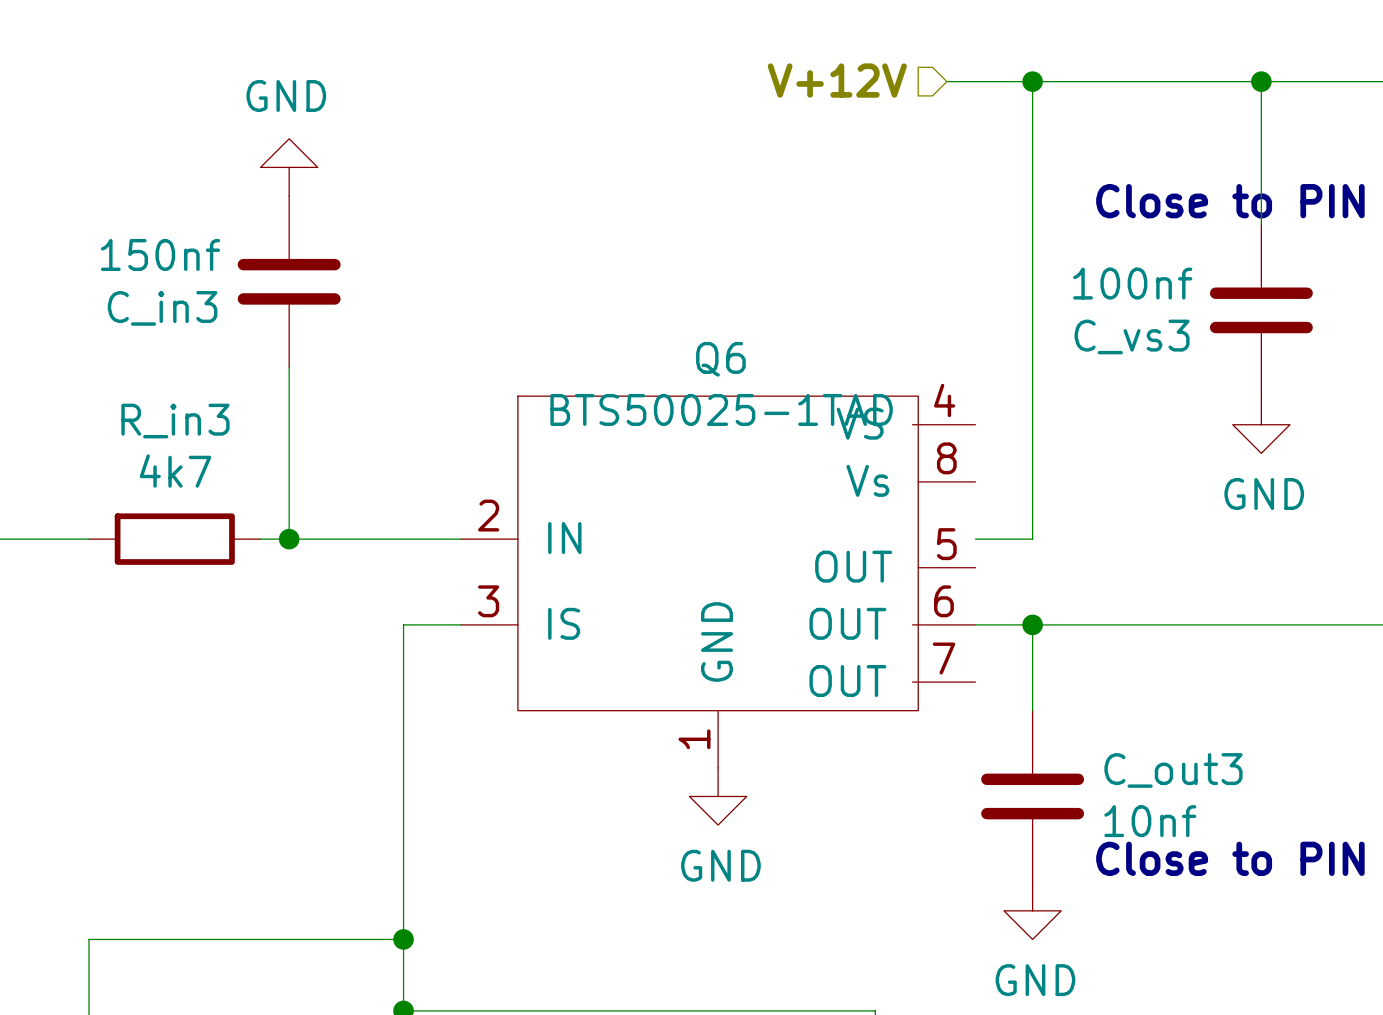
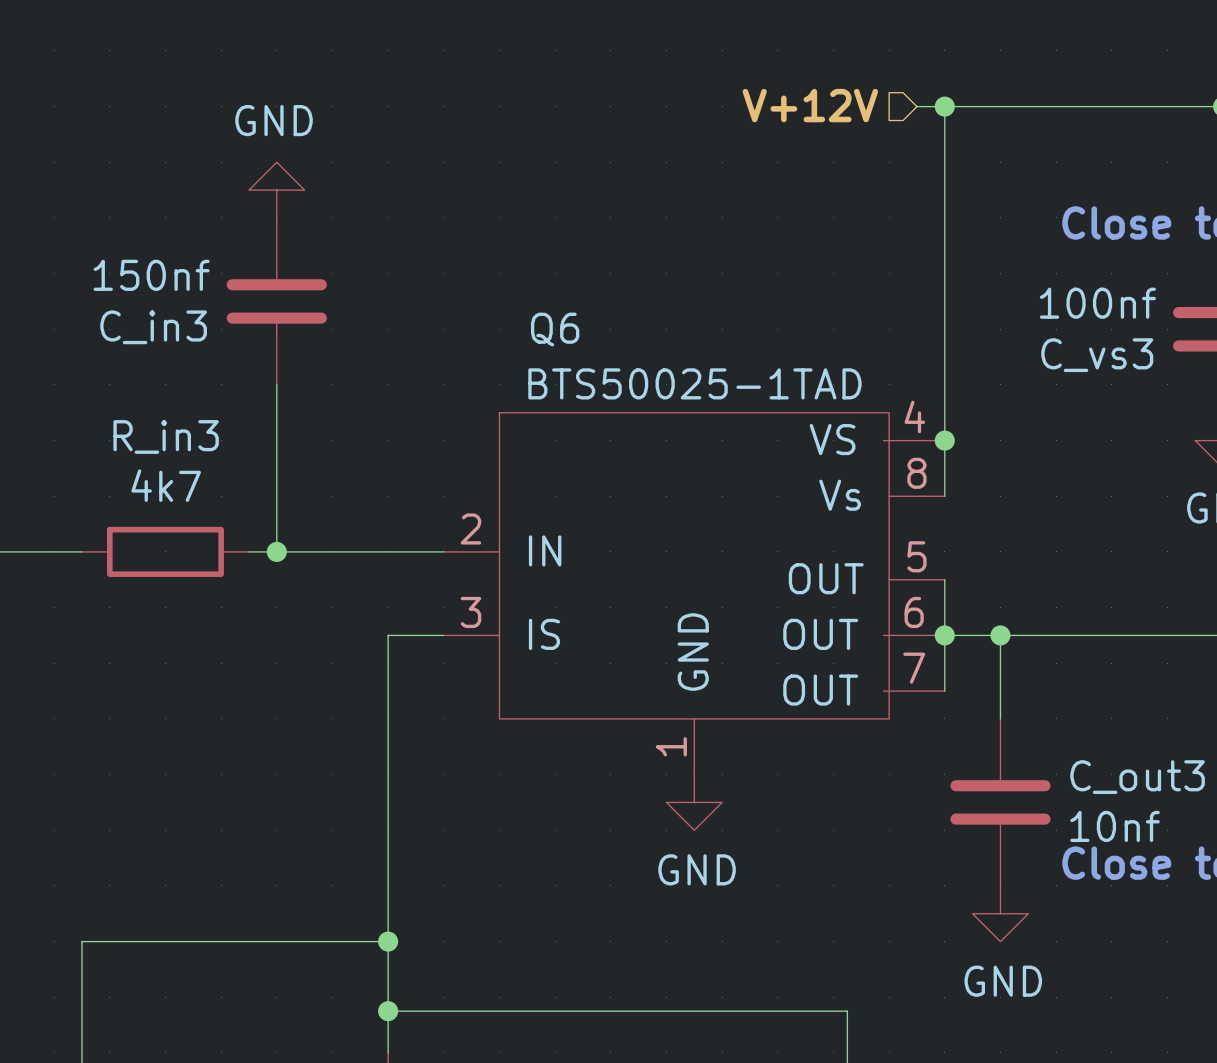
wire: none -> (944, 106) (944, 496)
wire: (1032, 81) (1032, 539) (975, 539) -> none
junction position: (1032, 81) -> (944, 106)
Q6 name position: Q6 (720, 359) -> Q6 (555, 329)
Q6 value position: BTS50025-1TAD (721, 409) -> BTS50025-1TAD (694, 383)
junction: none -> (944, 440)
wire: none -> (944, 579) (944, 691)
junction: none -> (944, 635)

